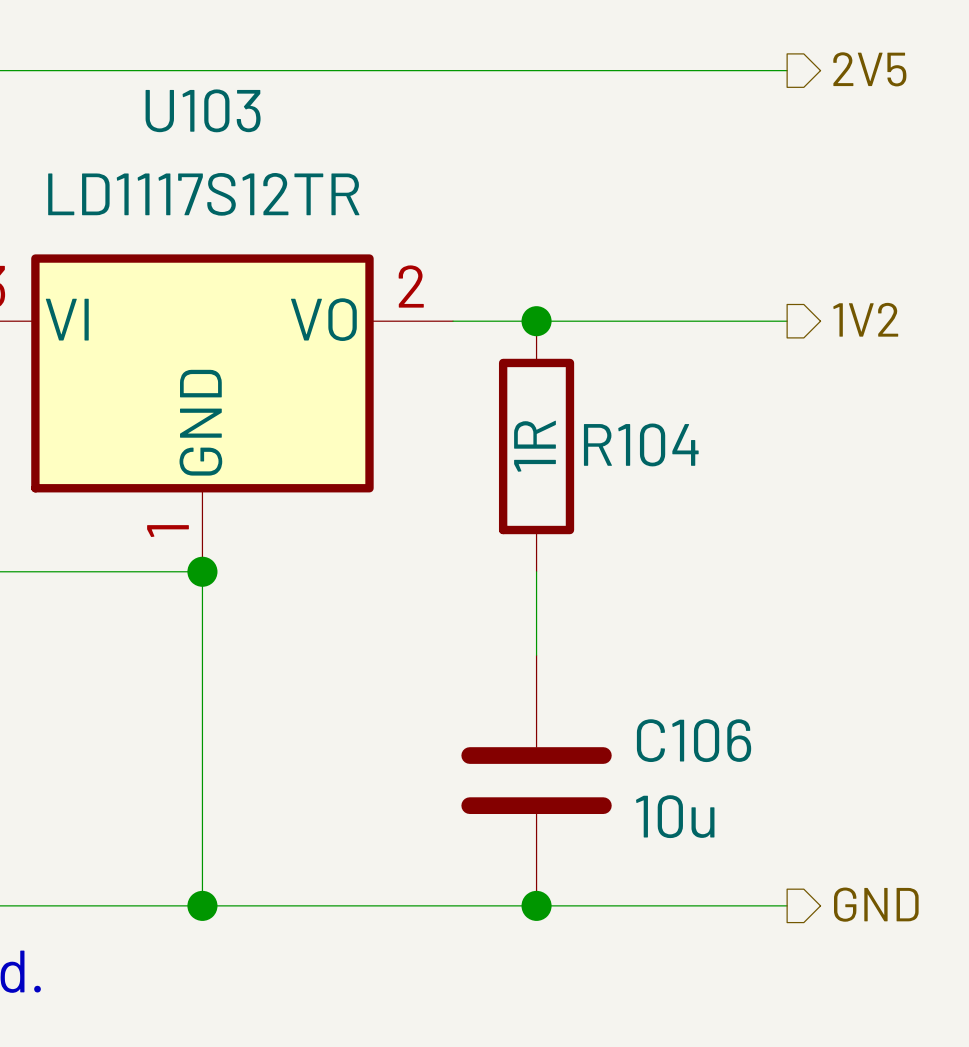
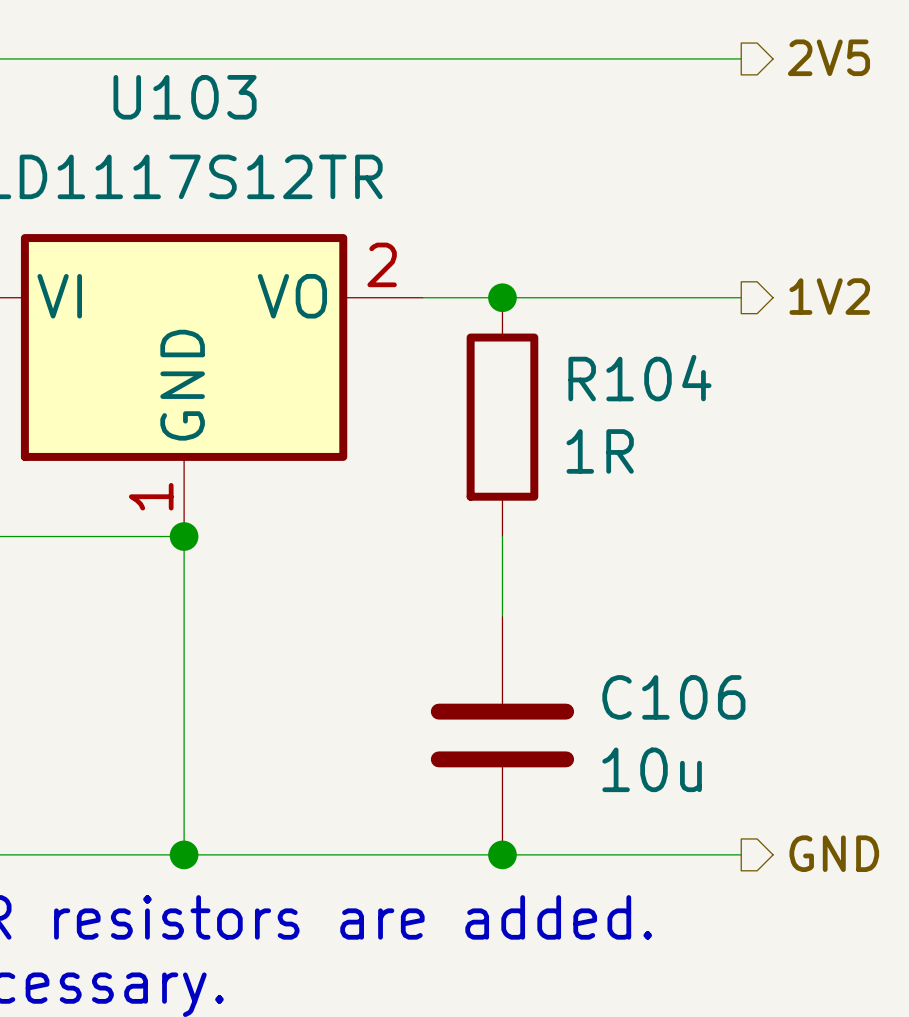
R104 name position: R104 (641, 444) -> R104 (639, 378)
R104 value rotation: 0° (534, 446) -> 90° clockwise (600, 451)
R104 value position: 1R (534, 446) -> 1R (600, 451)

